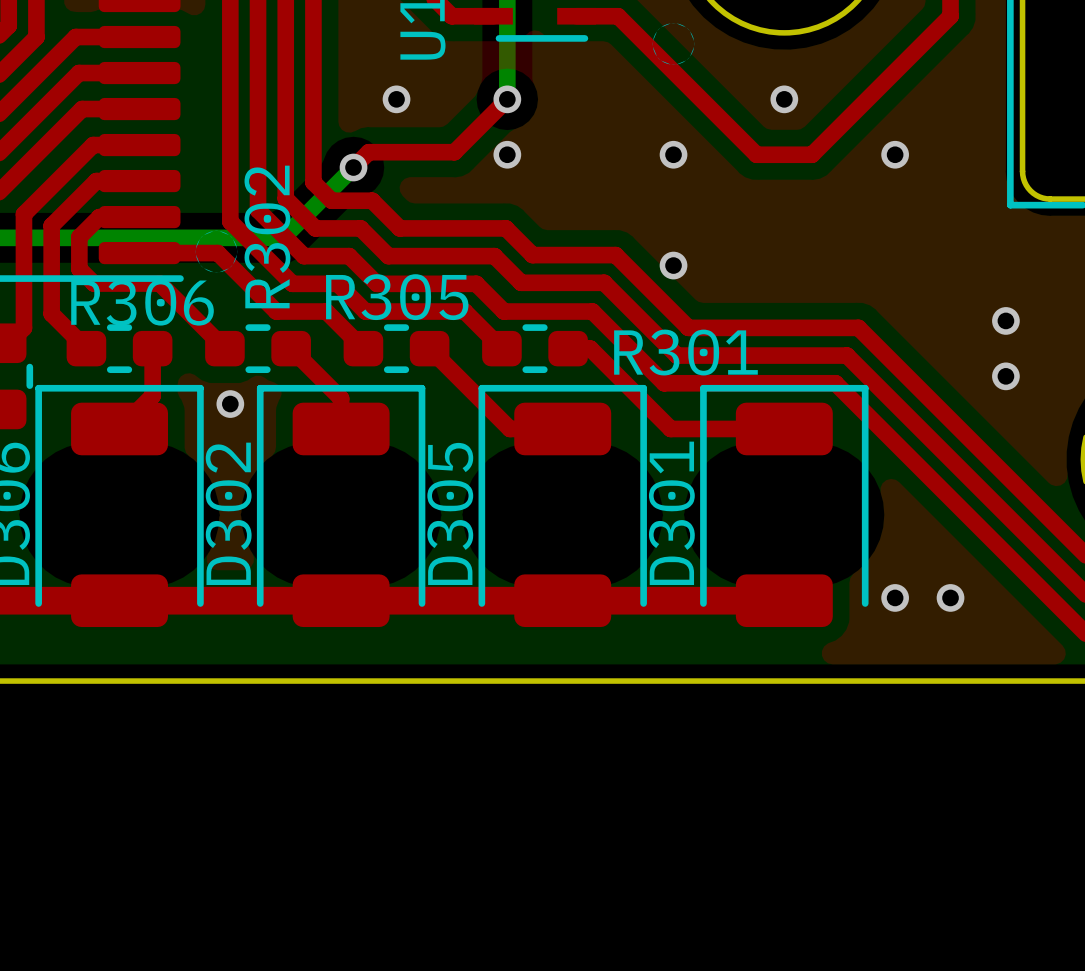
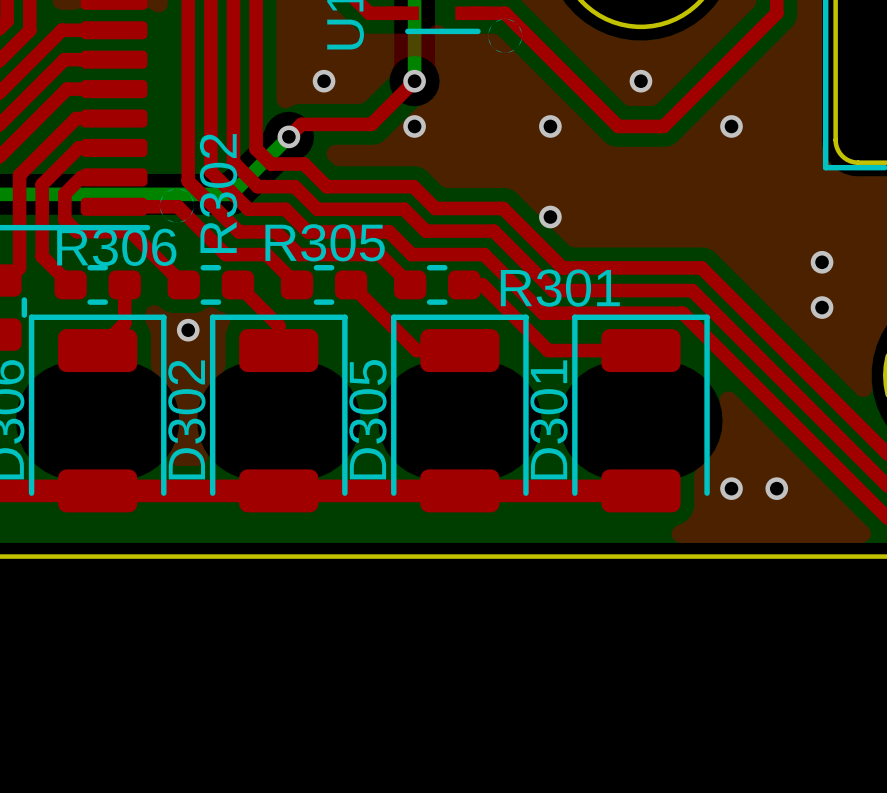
drawing position: (673, 43) -> (505, 35)

